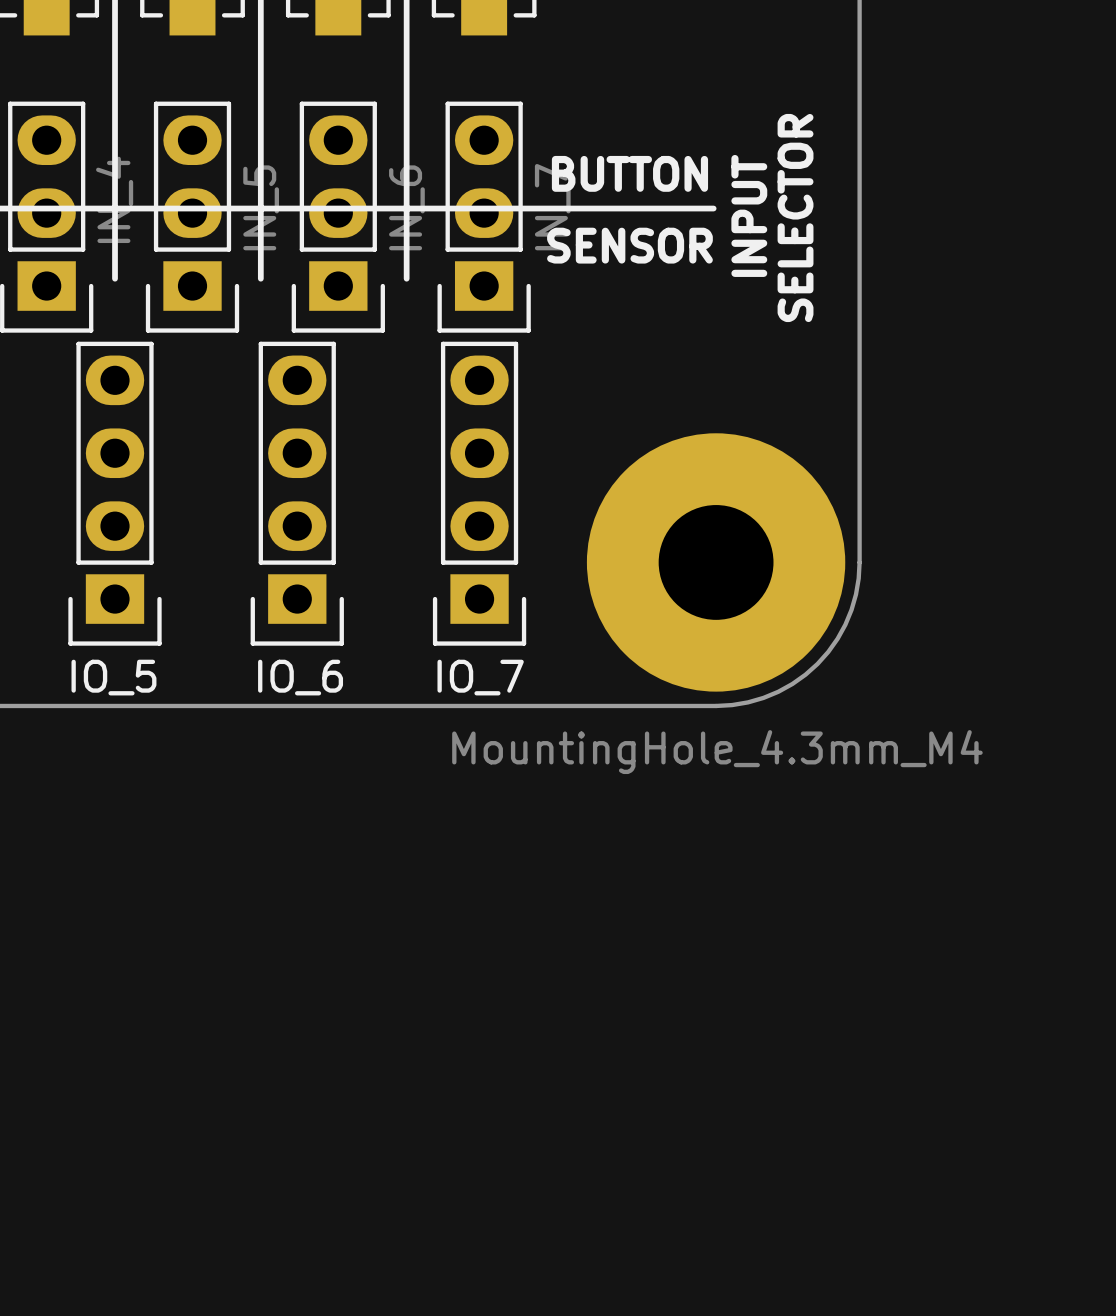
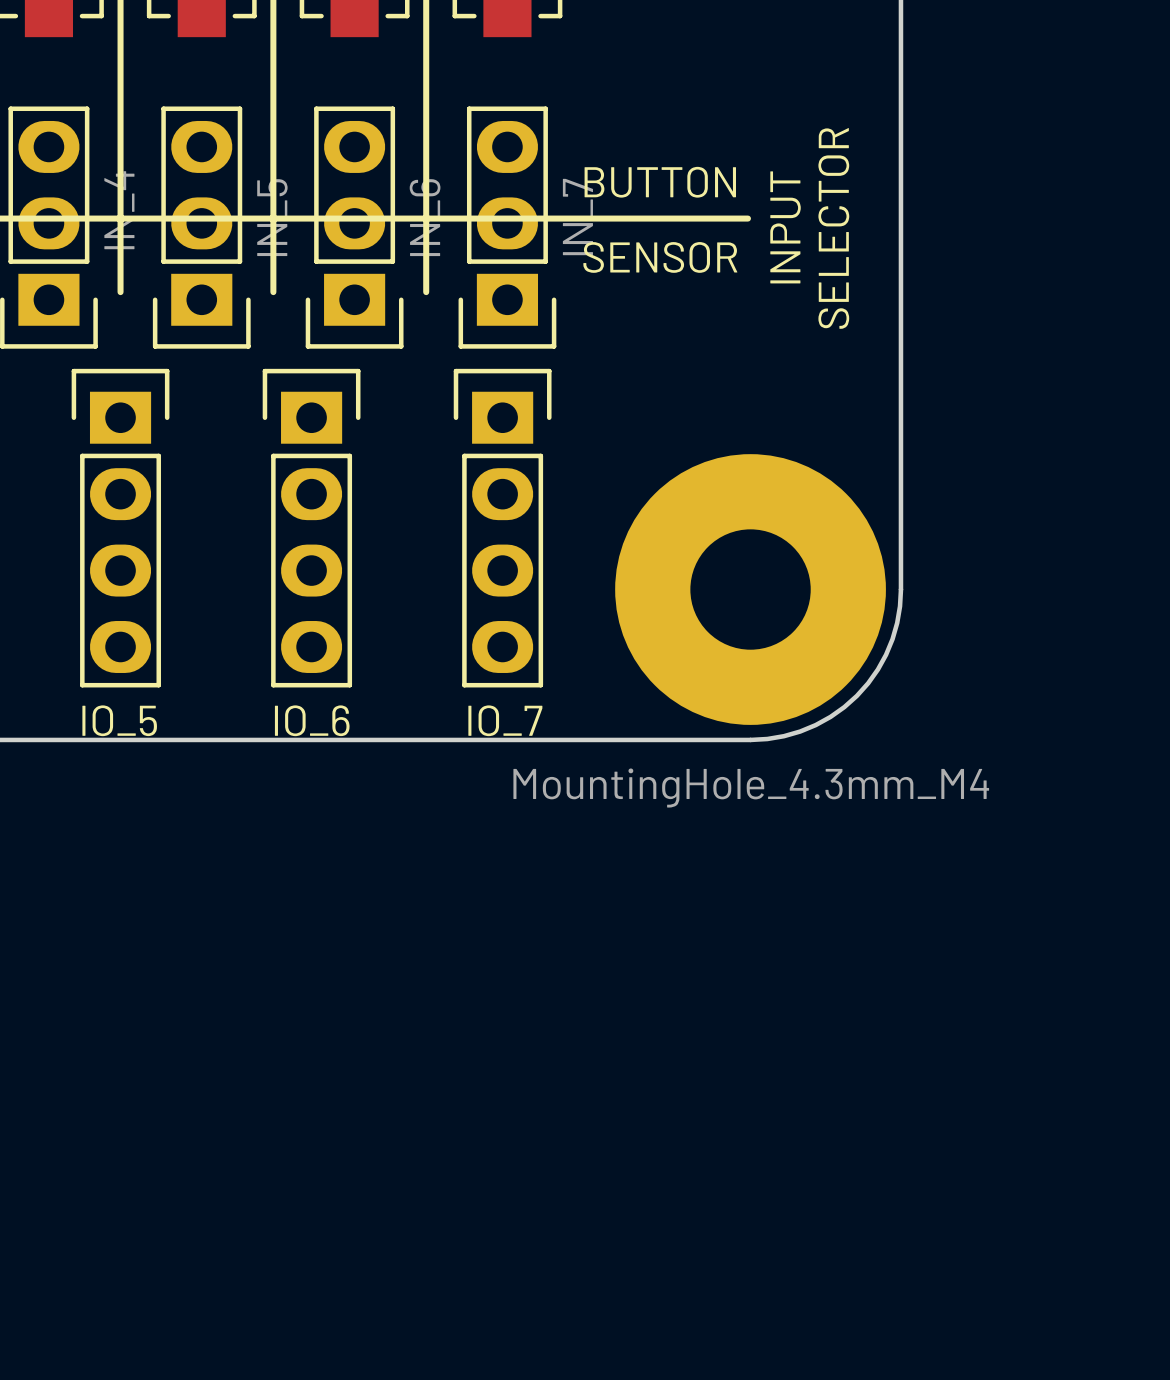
part rotation: 0° (115, 493) -> 180° (120, 528)
part rotation: 0° (297, 493) -> 180° (311, 528)
part rotation: 0° (479, 493) -> 180° (502, 528)

